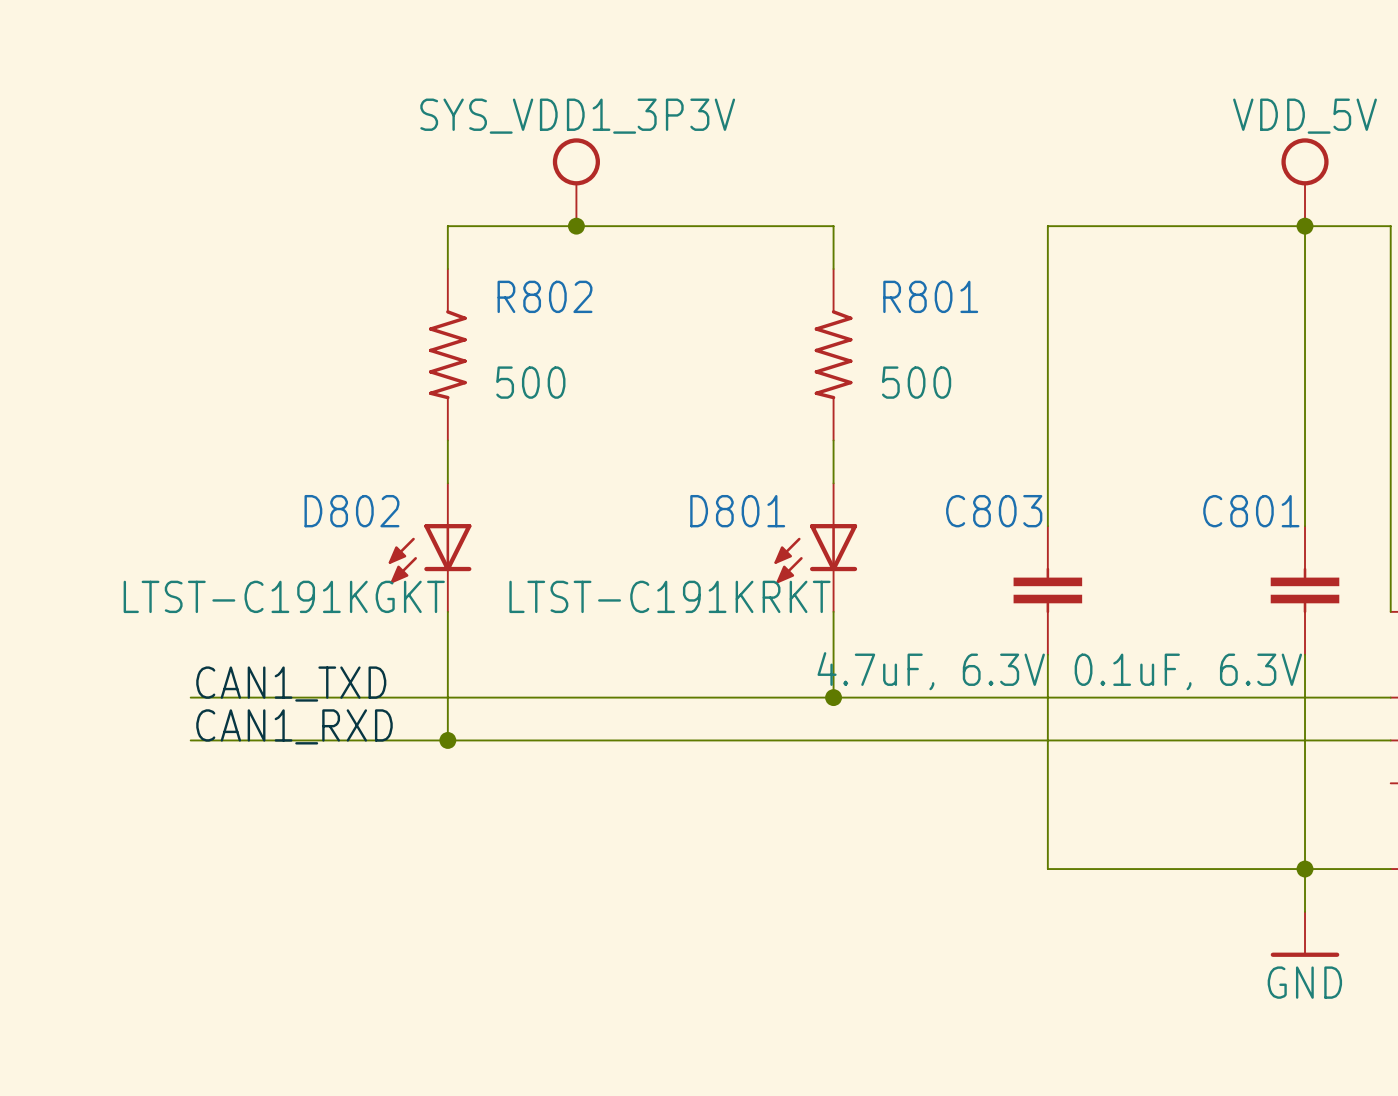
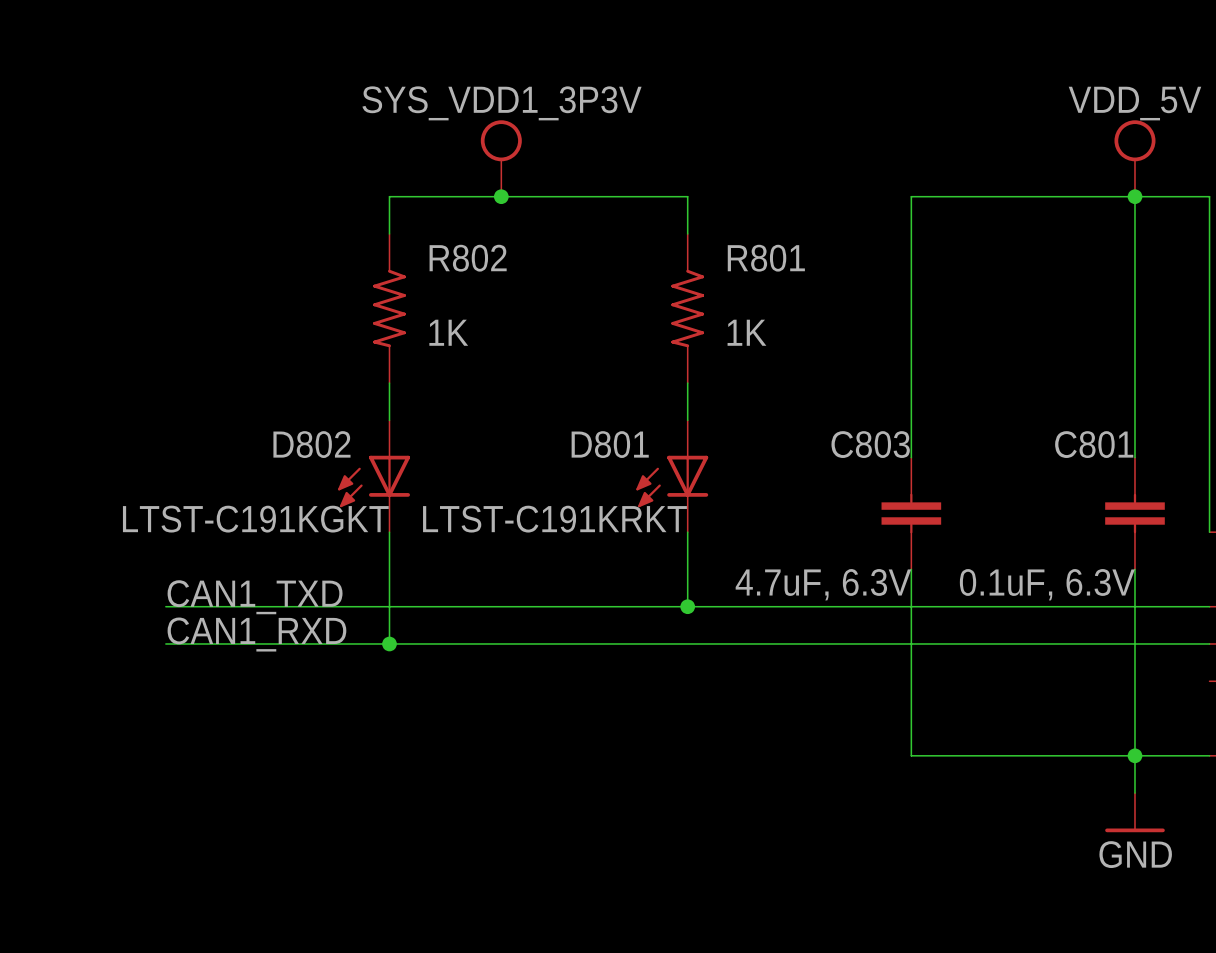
wire: (790, 226) (833, 226) (833, 269) -> (687, 196) (687, 233)
R801 position: (833, 354) -> (687, 308)
R802 value: 500 (530, 382) -> 1K (448, 332)
R801 value: 500 (916, 382) -> 1K (746, 332)
wire: (833, 440) (833, 483) -> (687, 383) (687, 420)
D801 position: (815, 547) -> (672, 476)
wire: (833, 611) (833, 697) -> (687, 532) (687, 606)
junction position: (833, 697) -> (687, 606)

